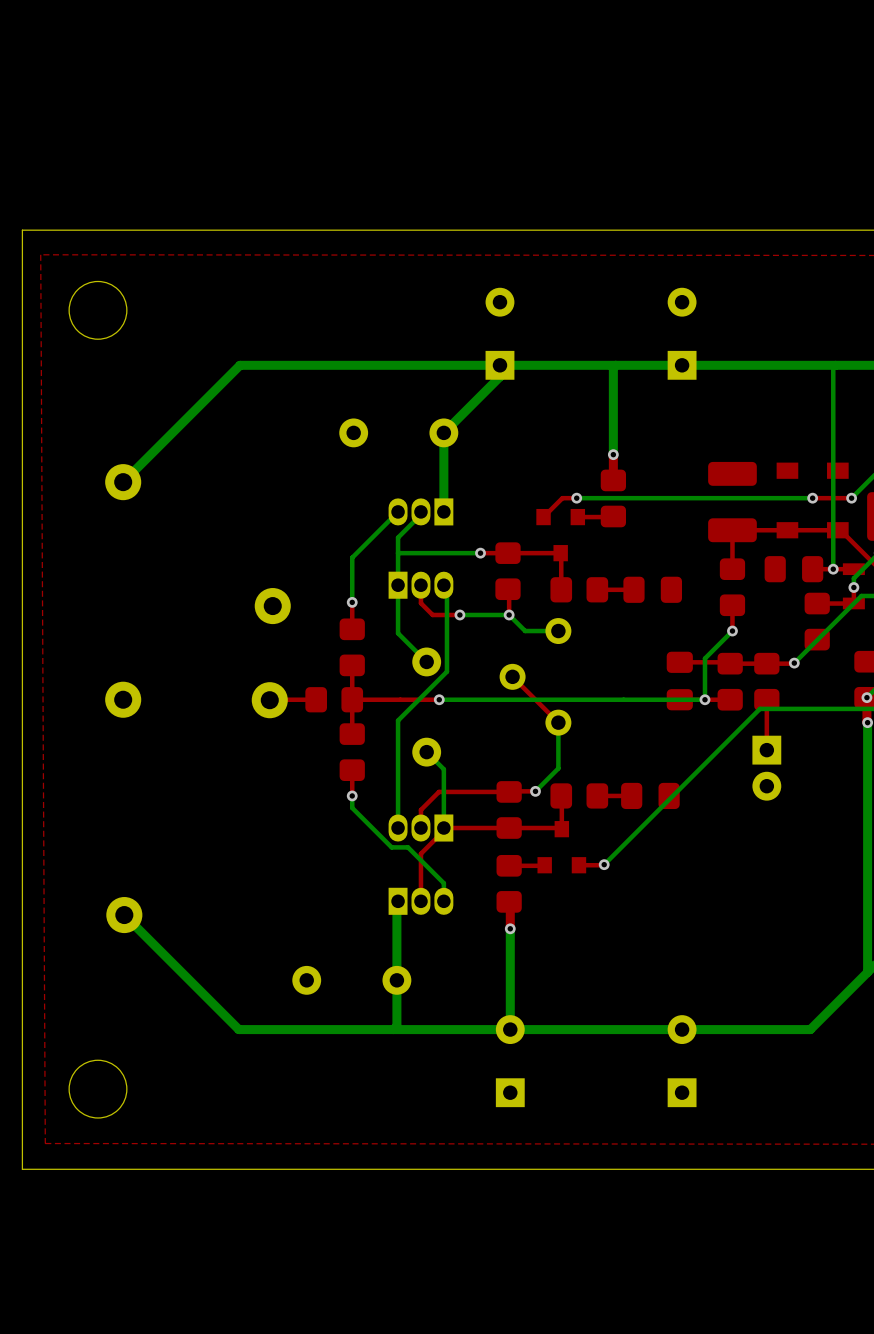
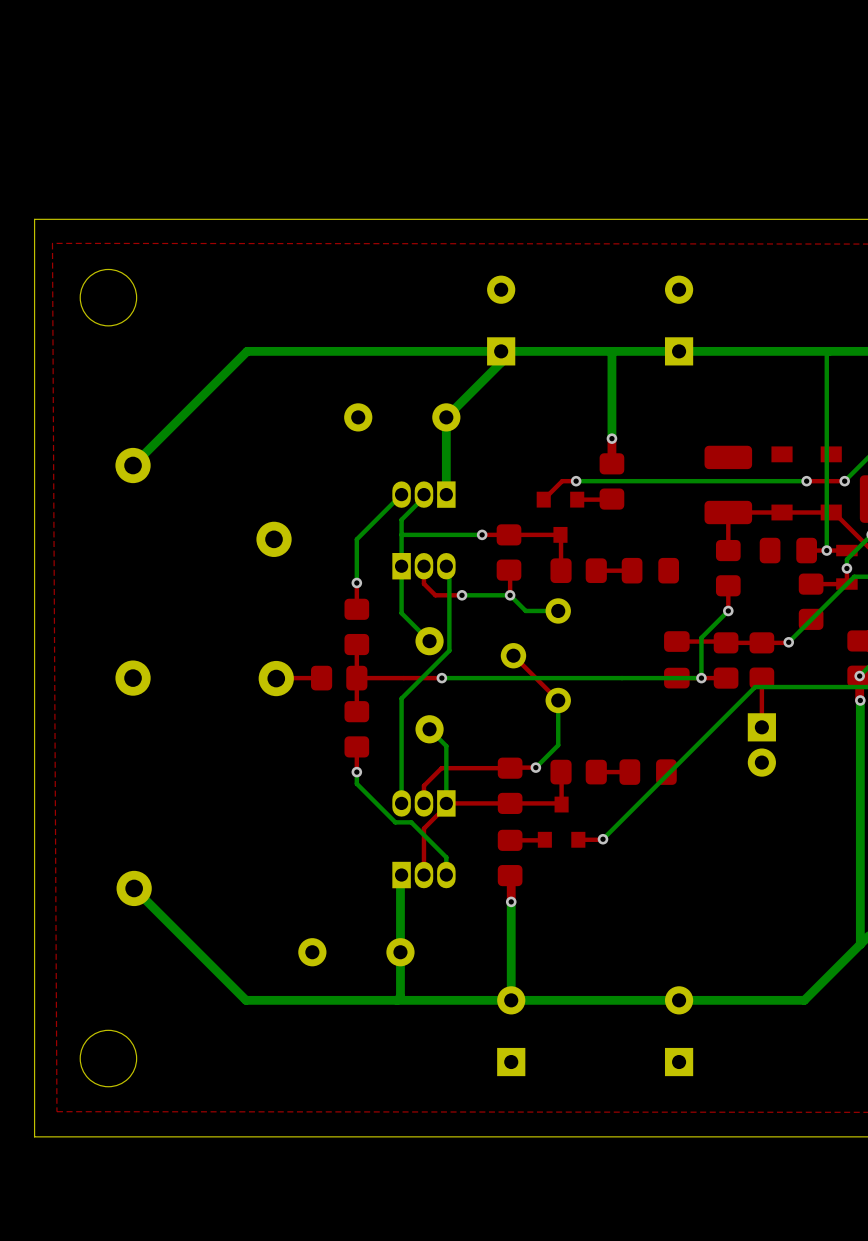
part position: (272, 606) -> (274, 539)

